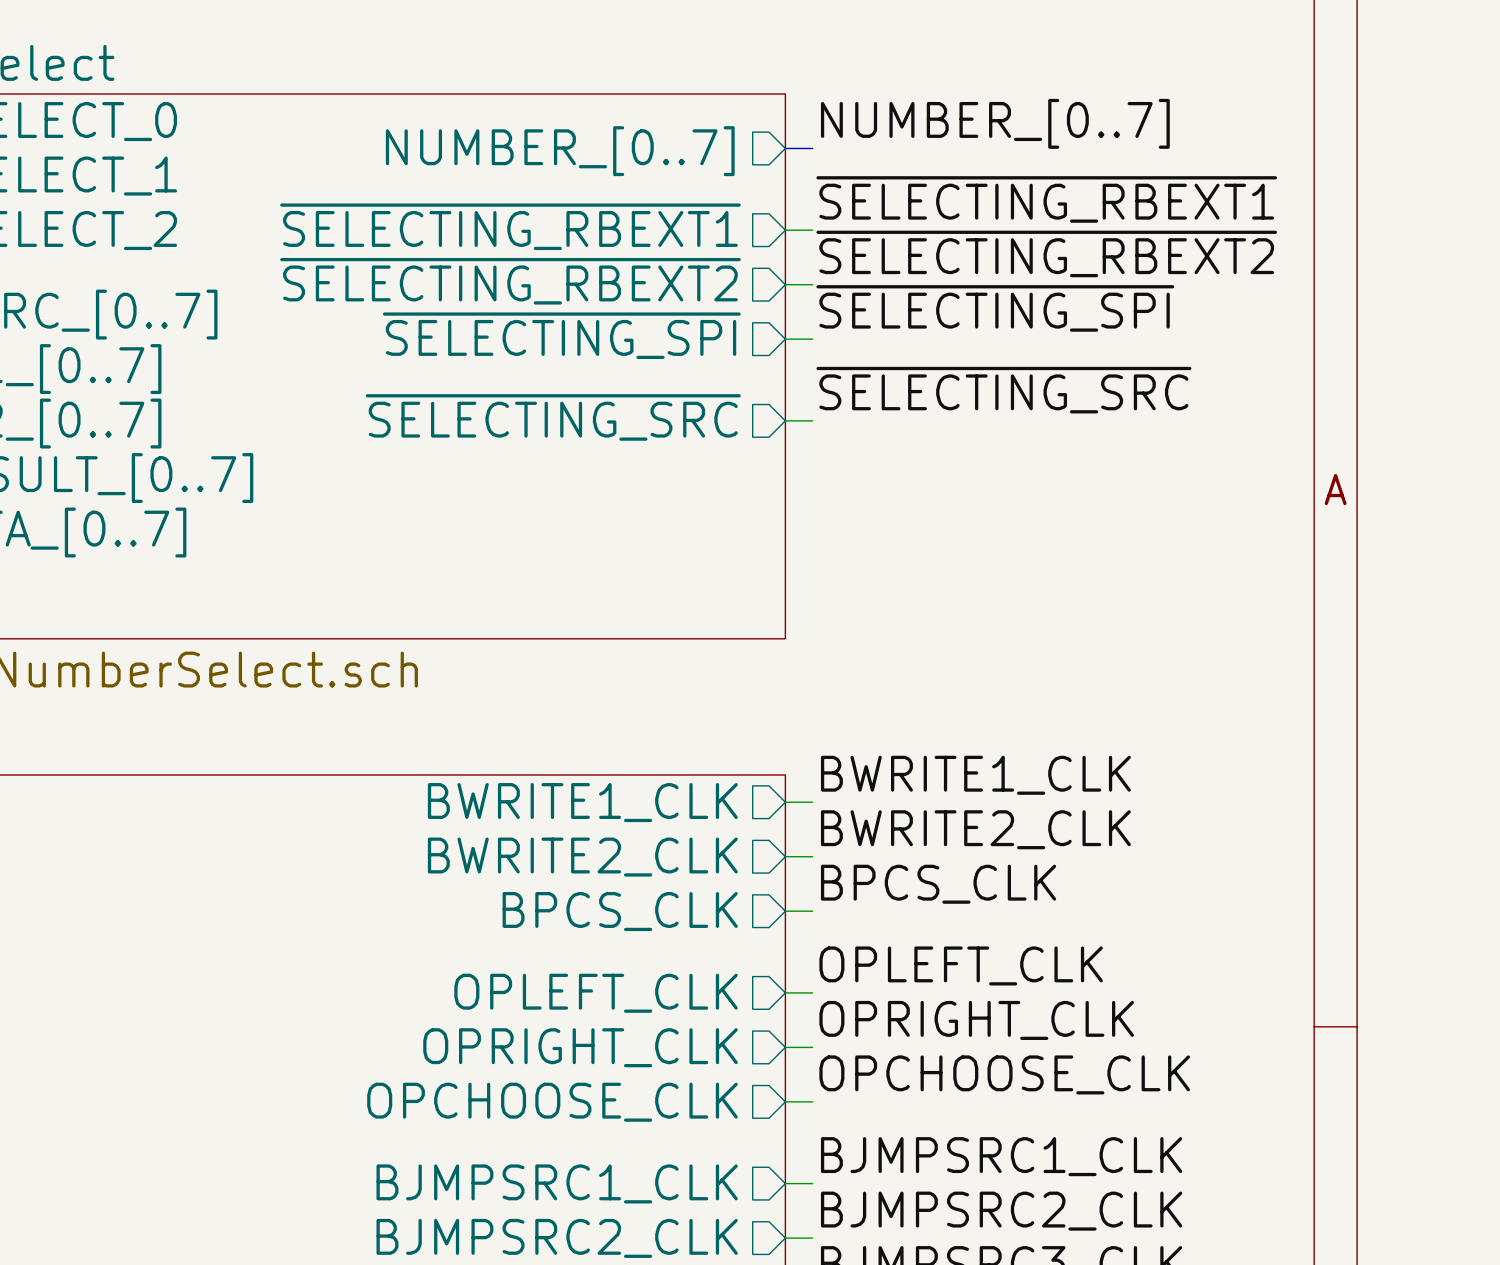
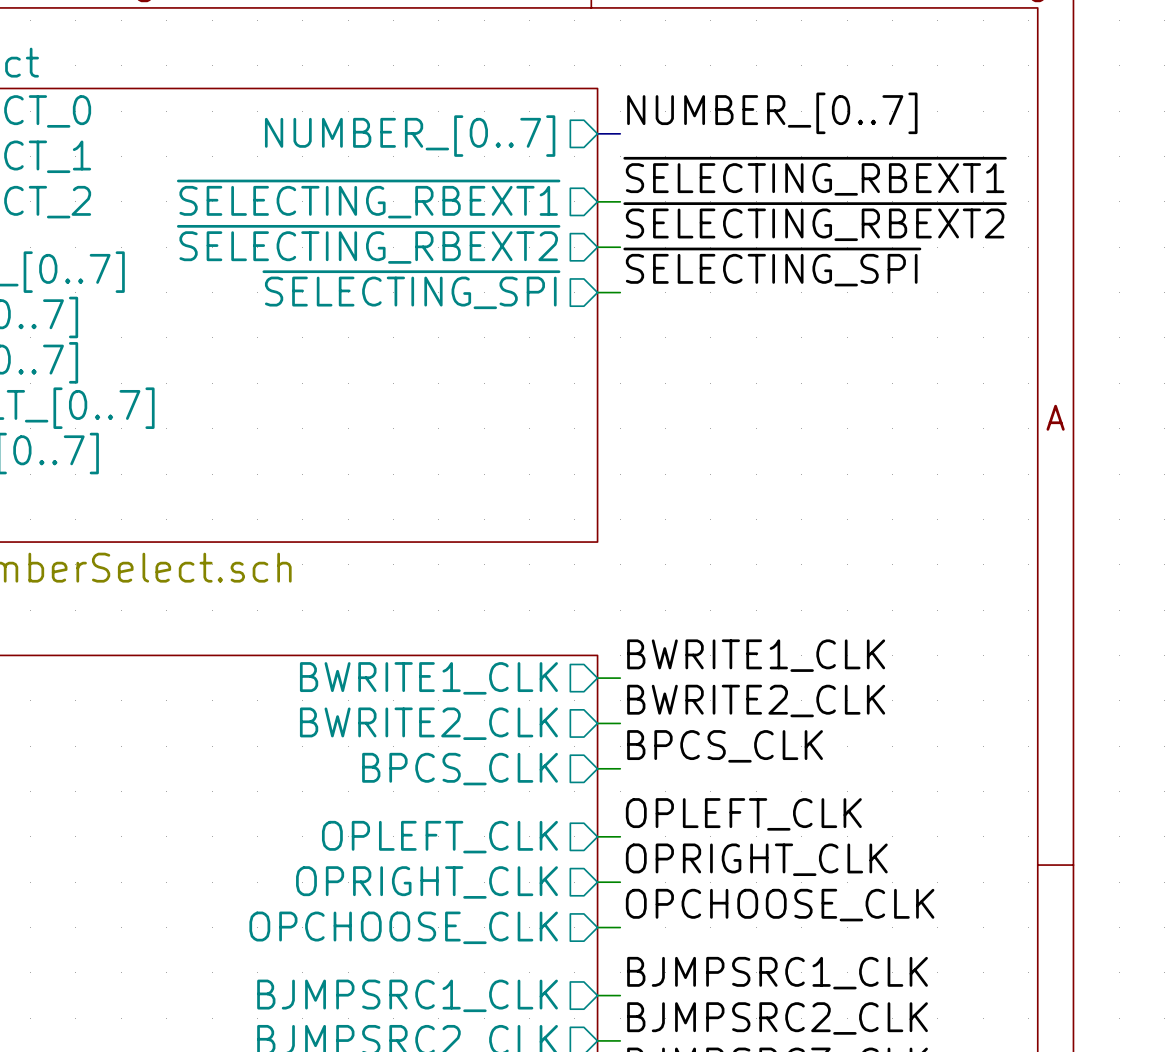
label: ~{SELECTING_SRC} (1003, 390) -> none
sheet pin: ~{SELECTING_SRC} (553, 417) -> none
wire: (785, 420) (812, 420) -> none

